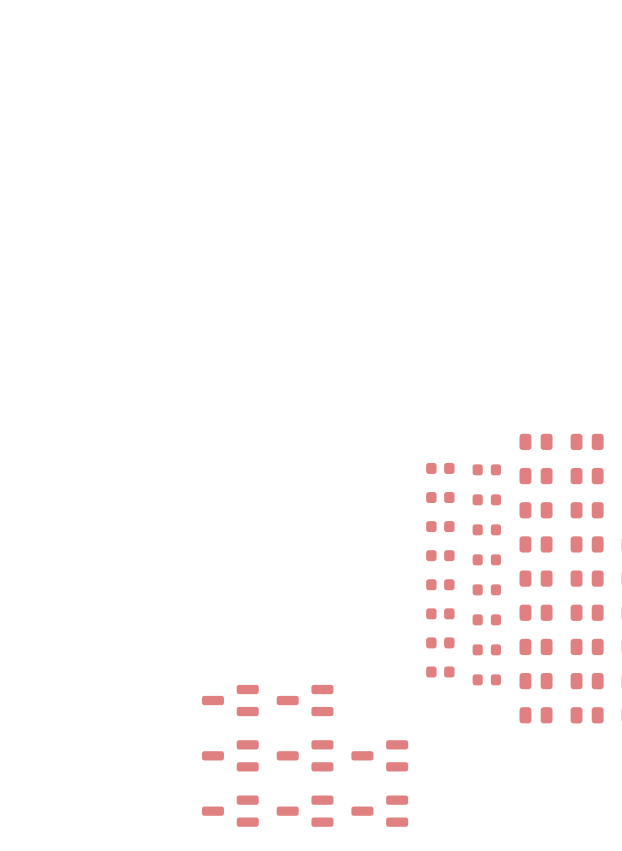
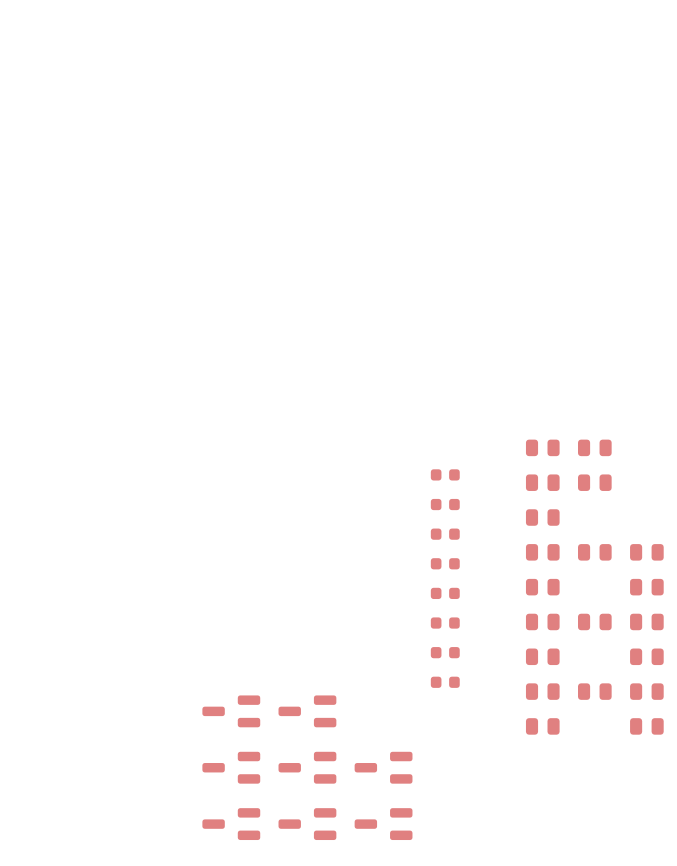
part: (486, 469) -> none
part: (486, 499) -> none
part: (587, 510) -> none
part: (486, 529) -> none
part: (486, 559) -> none
part: (587, 578) -> none
part: (486, 589) -> none
part: (486, 619) -> none
part: (587, 646) -> none
part: (486, 649) -> none
part: (486, 679) -> none
part: (587, 715) -> none

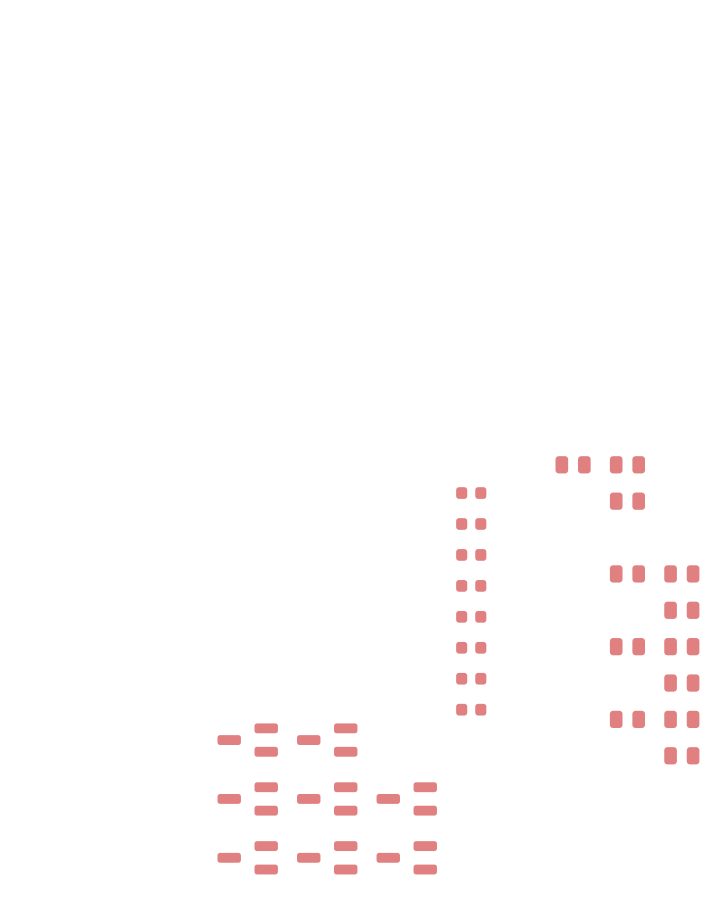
part: (542, 482) -> none
part: (542, 517) -> none
part: (542, 552) -> none
part: (542, 587) -> none
part: (542, 621) -> none
part: (542, 656) -> none
part: (542, 691) -> none
part: (542, 726) -> none

